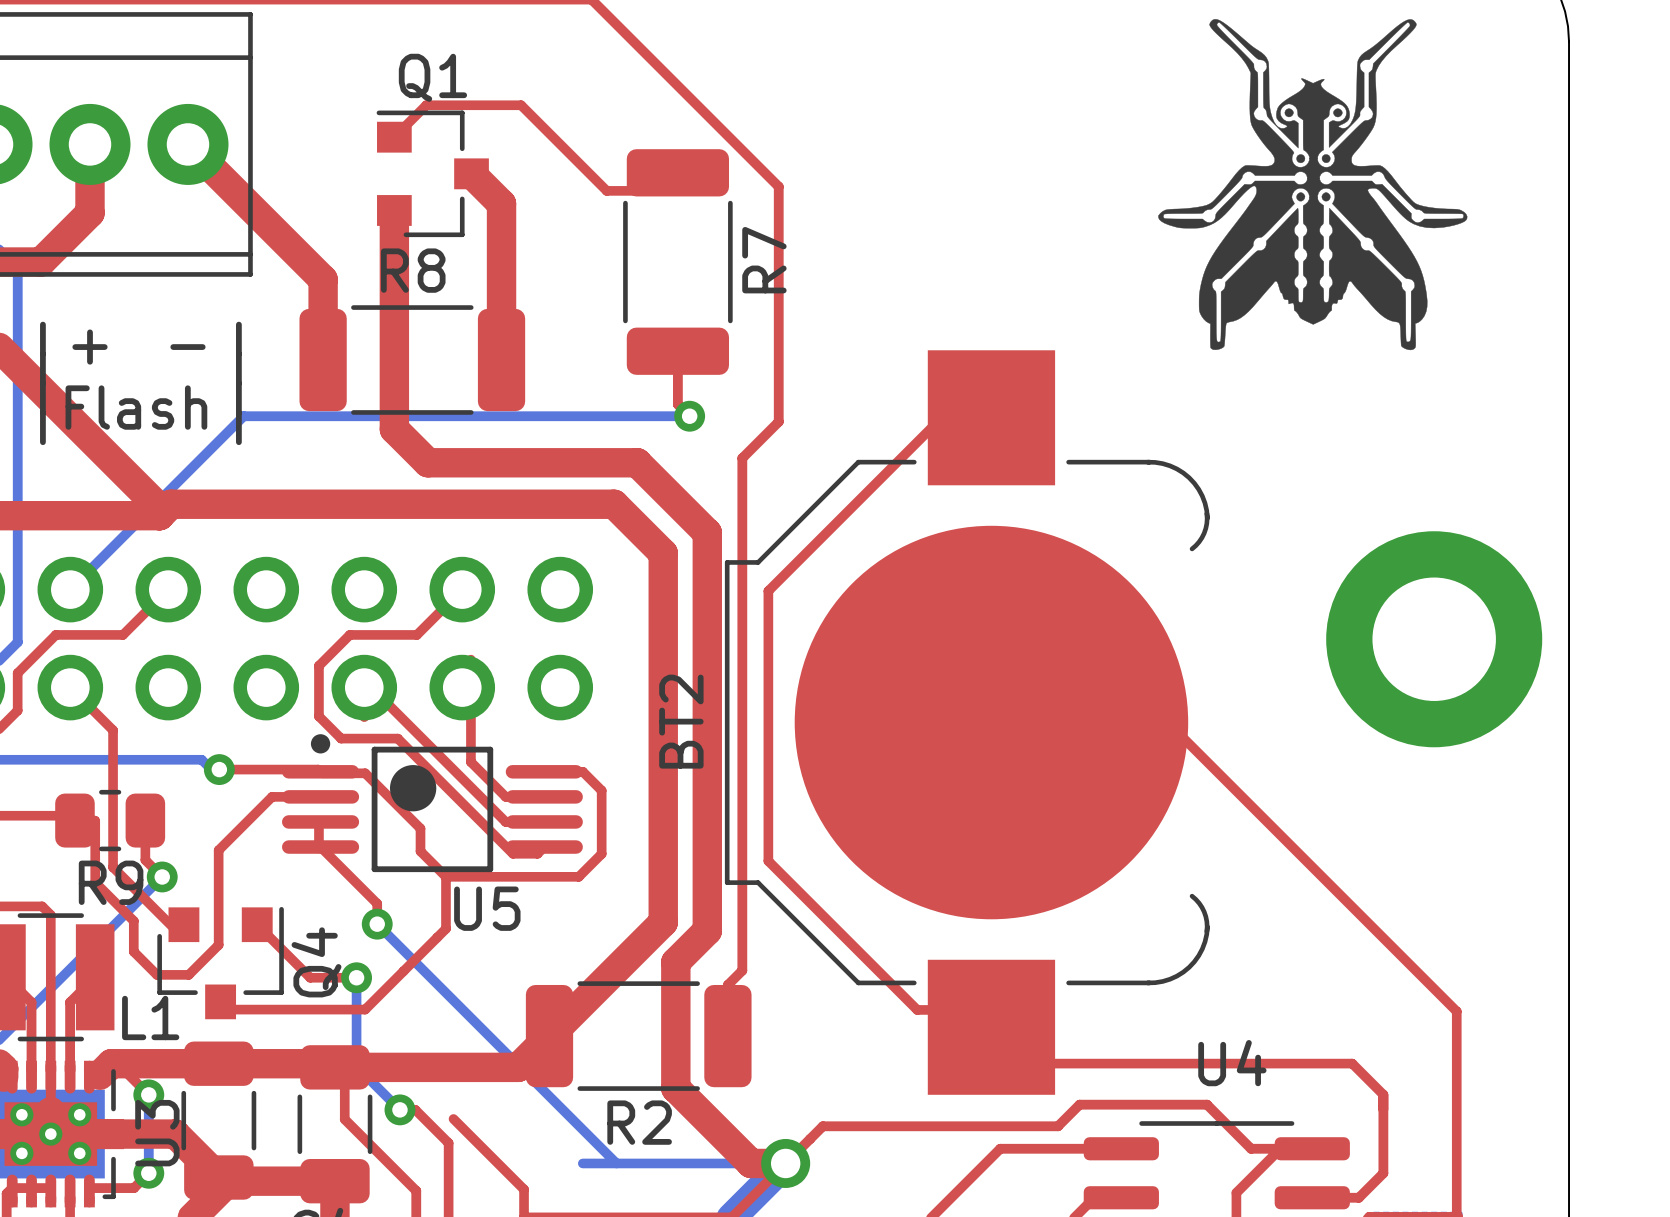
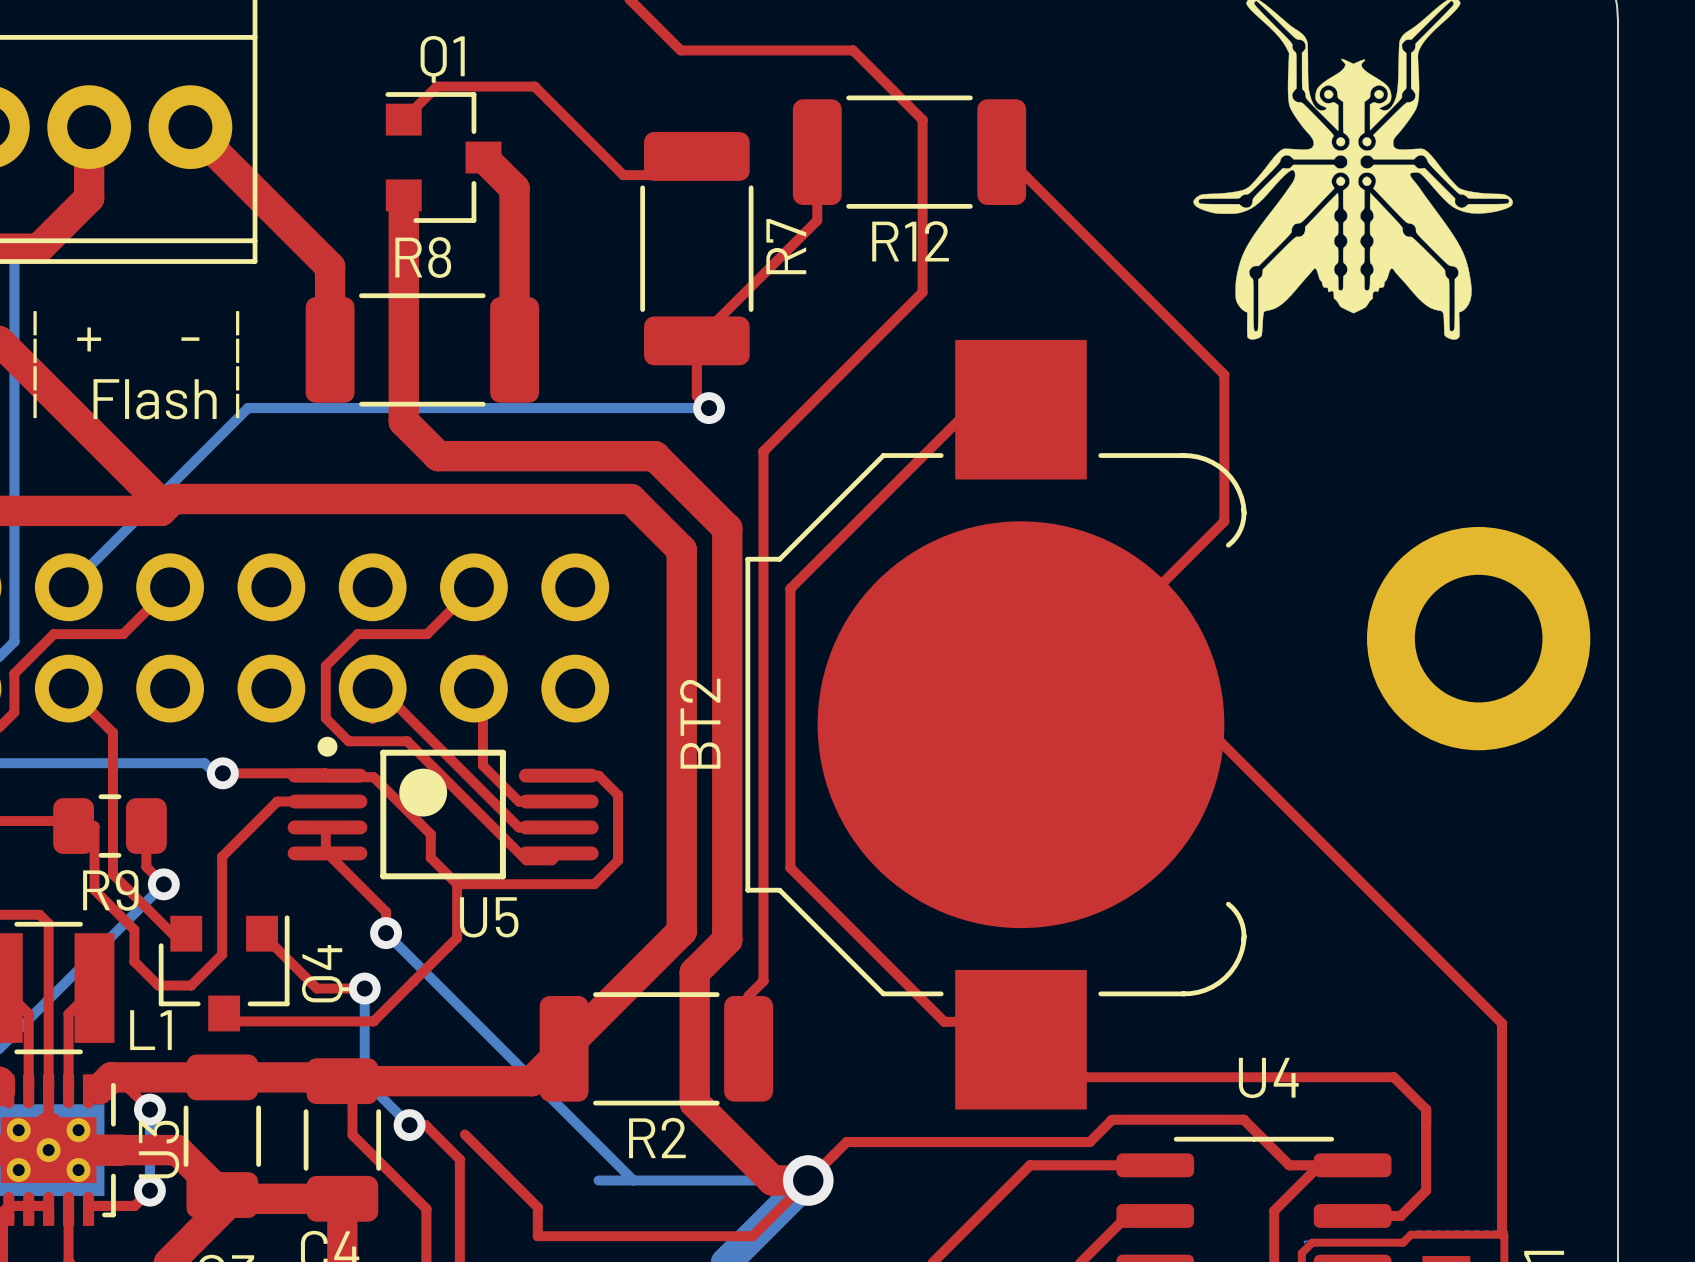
top track: (662, 70) (778, 186) (778, 421) -> (680, 50) (853, 50) (922, 119) (922, 292) (801, 413)
top track: none -> (817, 152) (817, 220) (696, 340)
R12: none -> (909, 152)
top track: none -> (1001, 152) (1224, 374) (1224, 521) (1020, 724)

